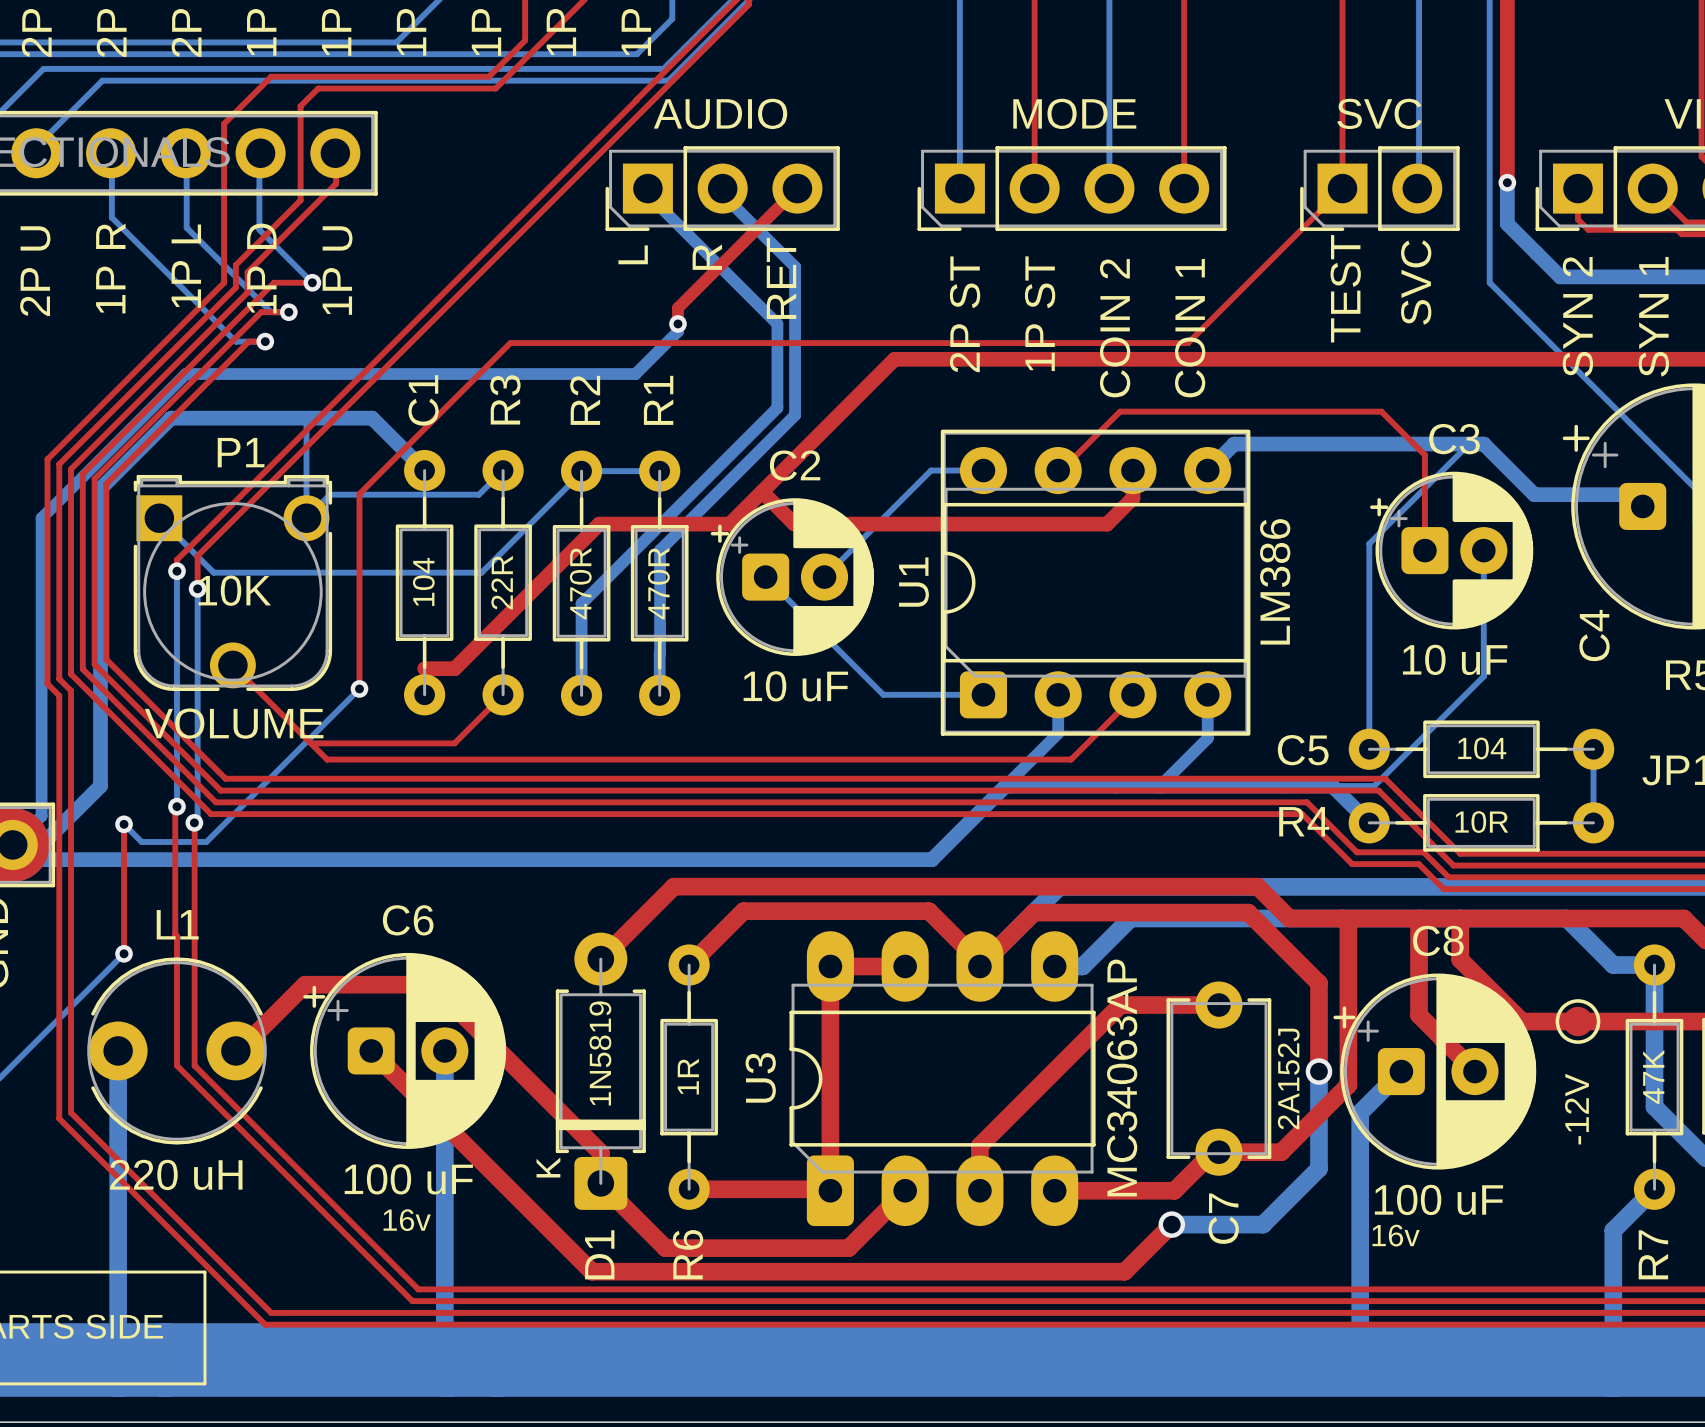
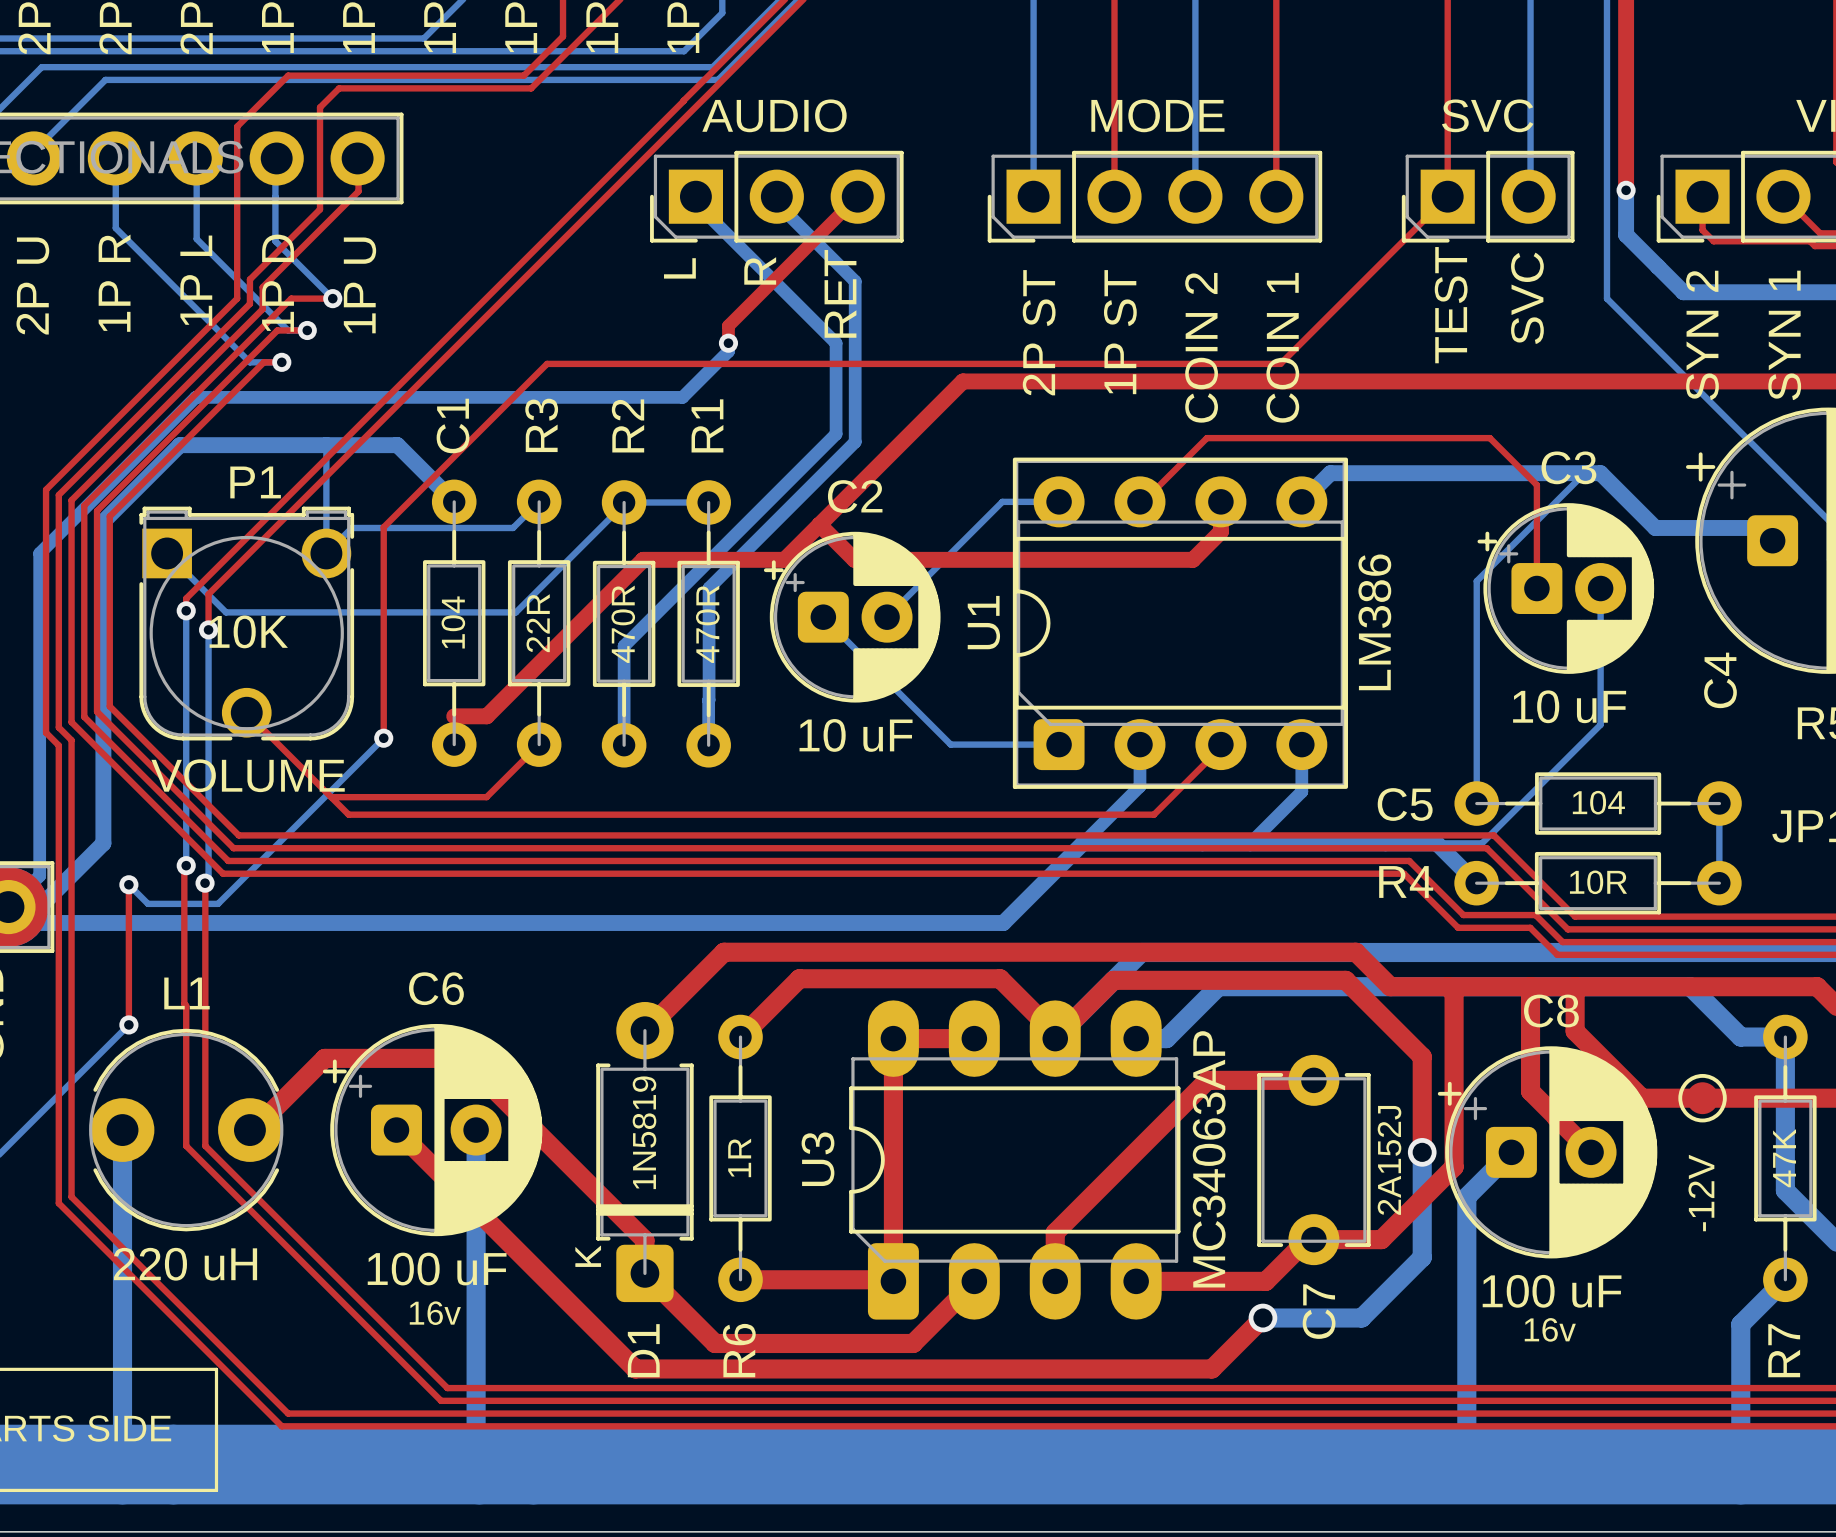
text position: 16v (1396, 1235) -> 16v (1550, 1329)

